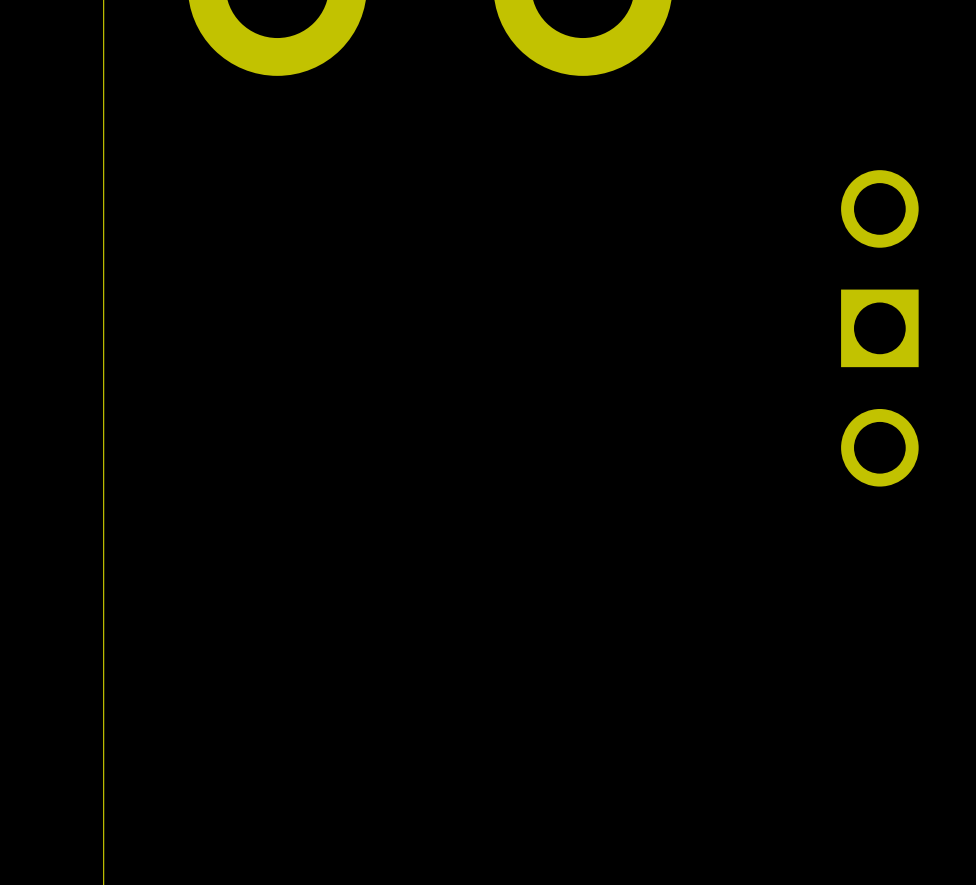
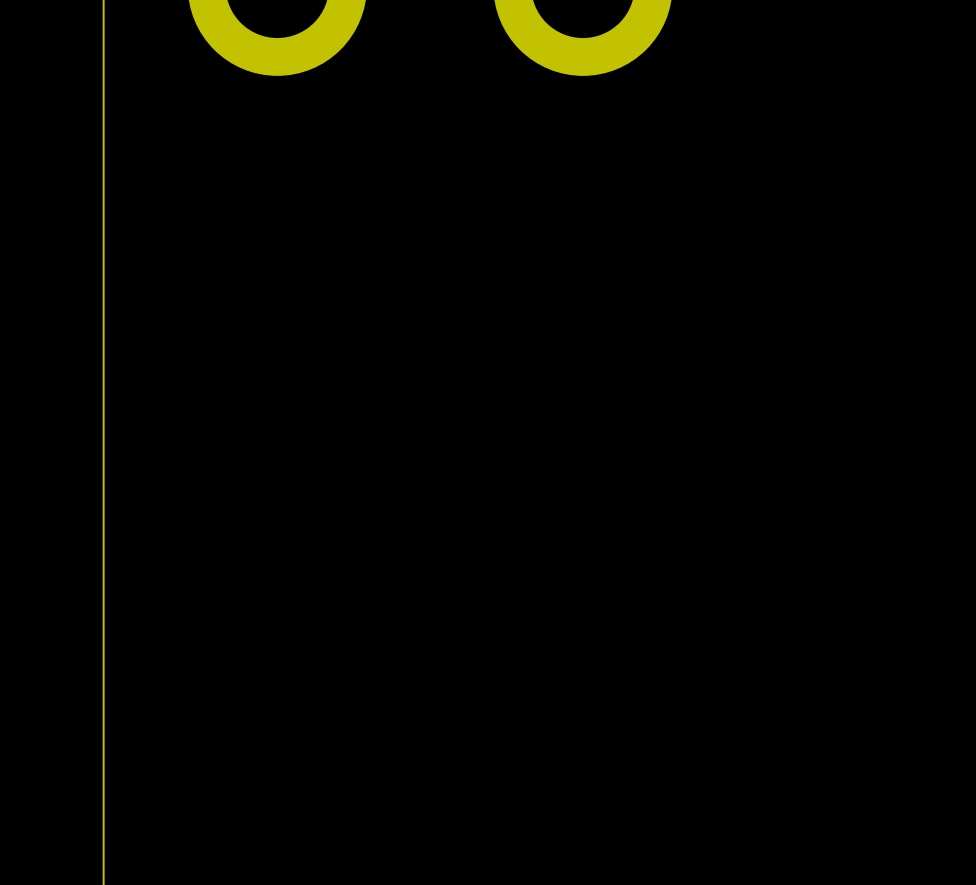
part: (879, 328) -> none

